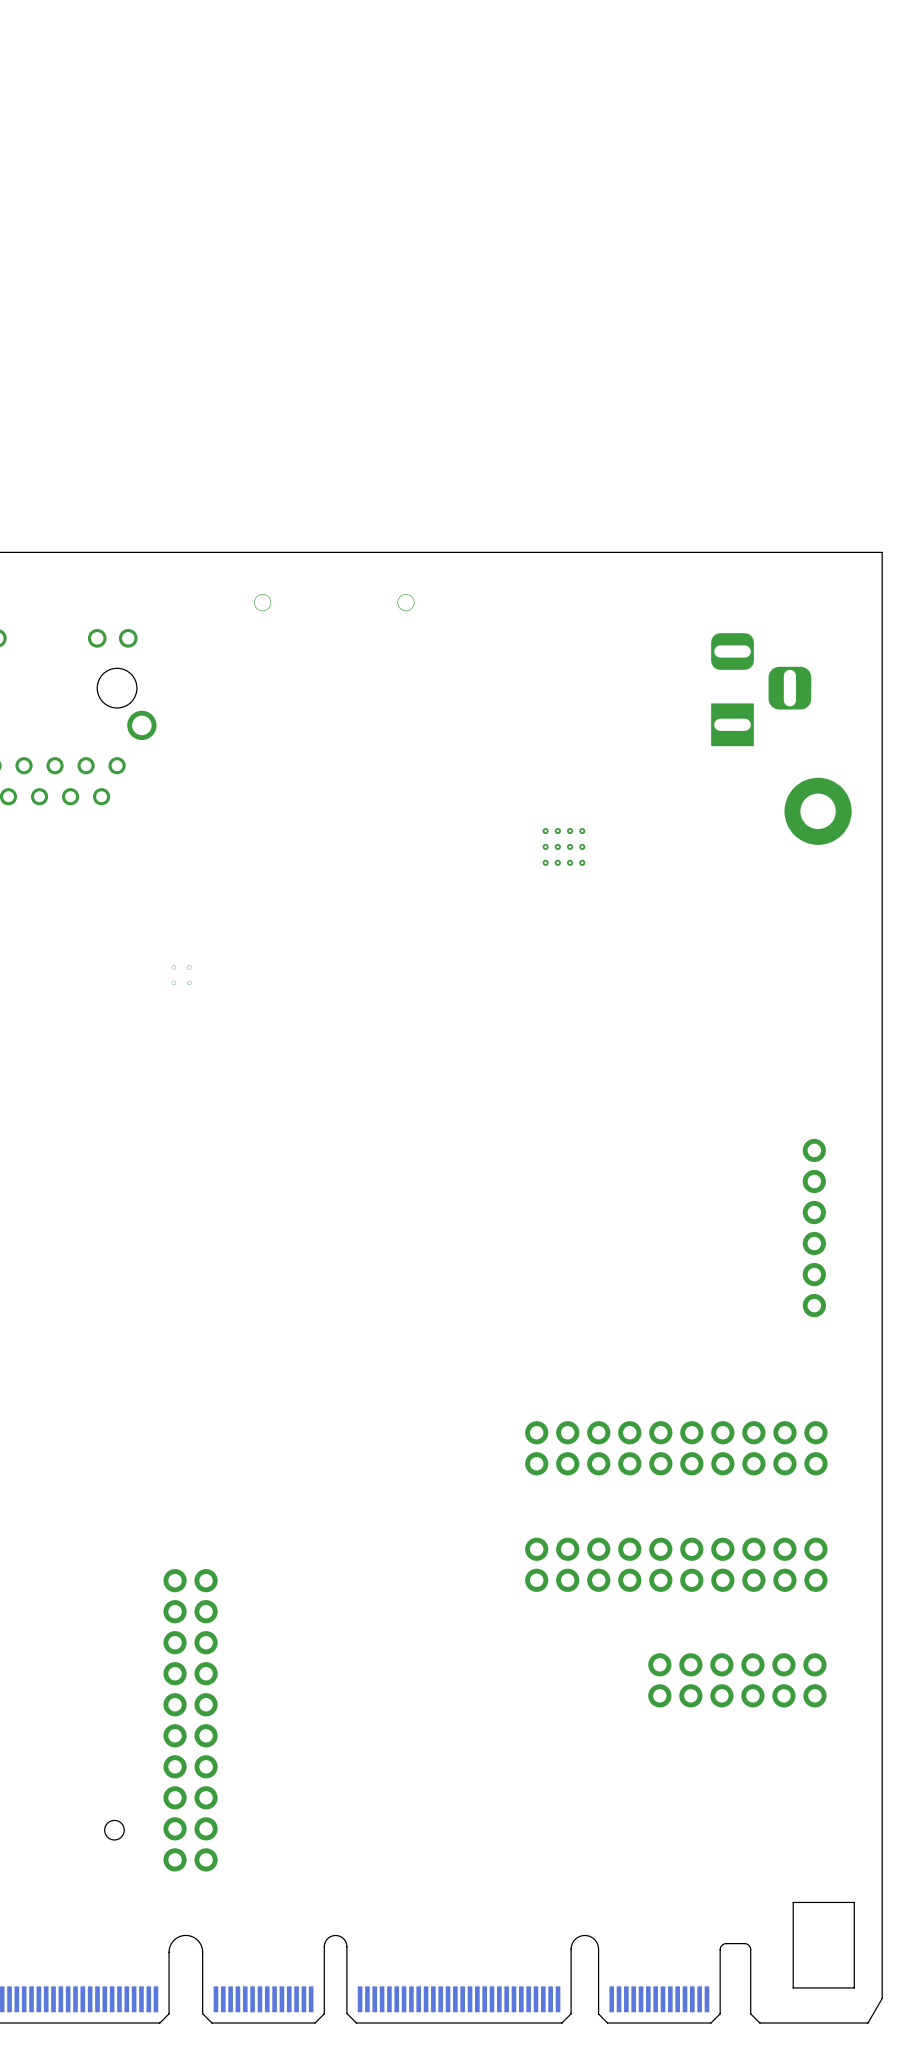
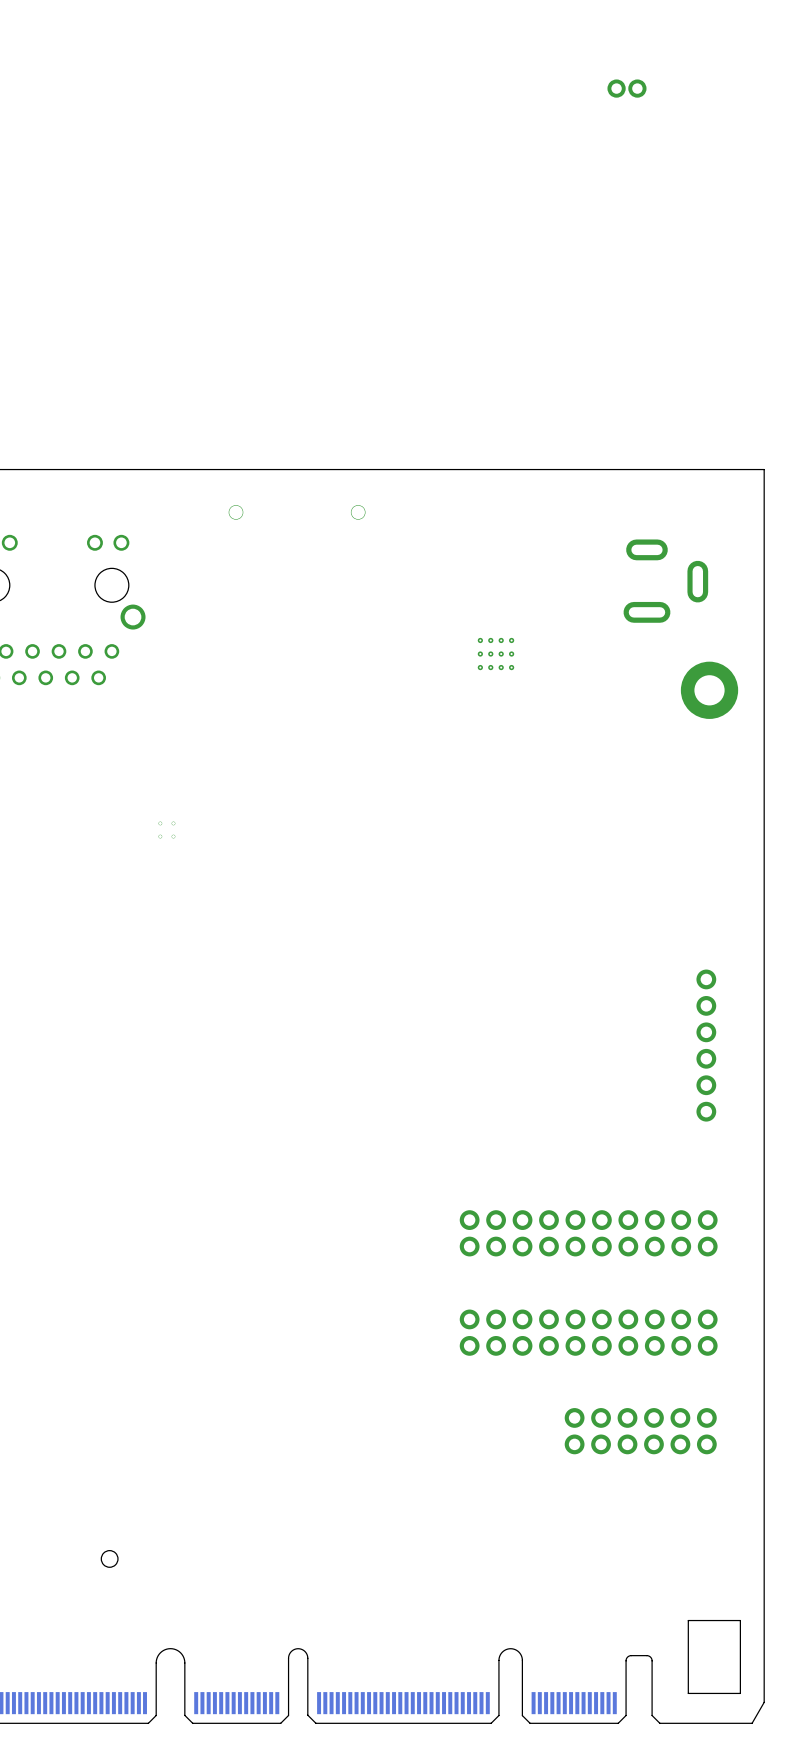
part: none -> (626, 88)
part footprint: [711, 633, 812, 747] -> [623, 539, 709, 623]
part position: (563, 846) -> (495, 654)
part: (190, 1720) -> none

